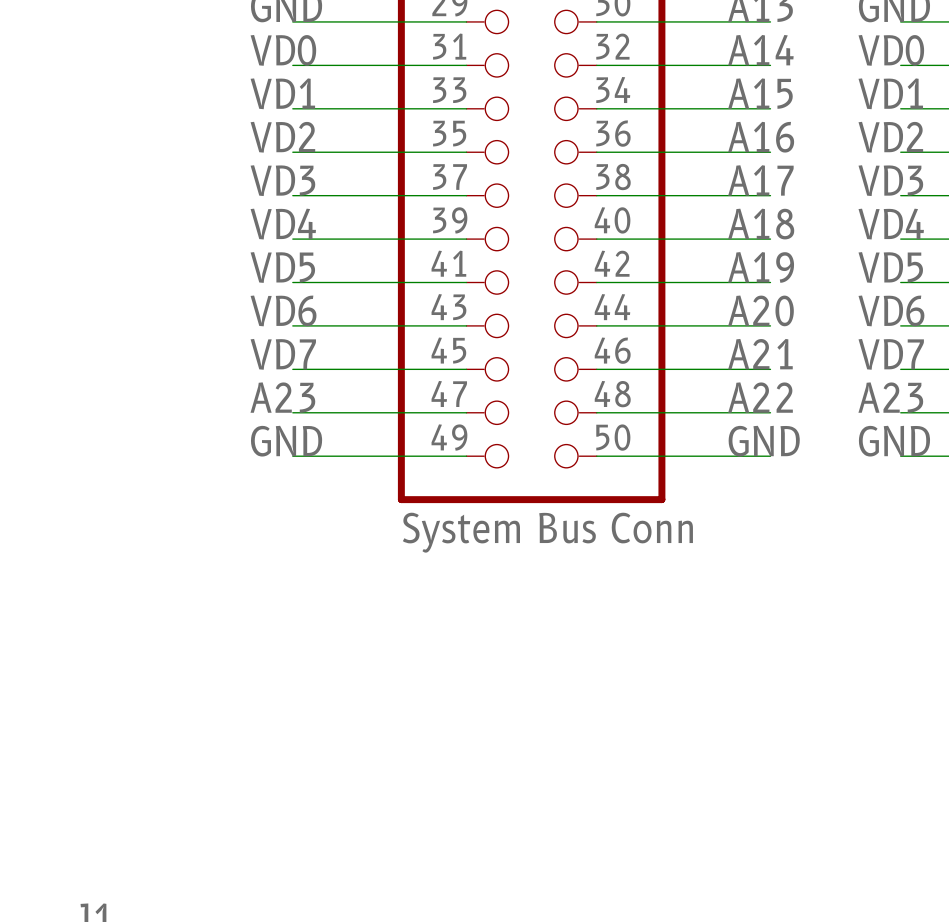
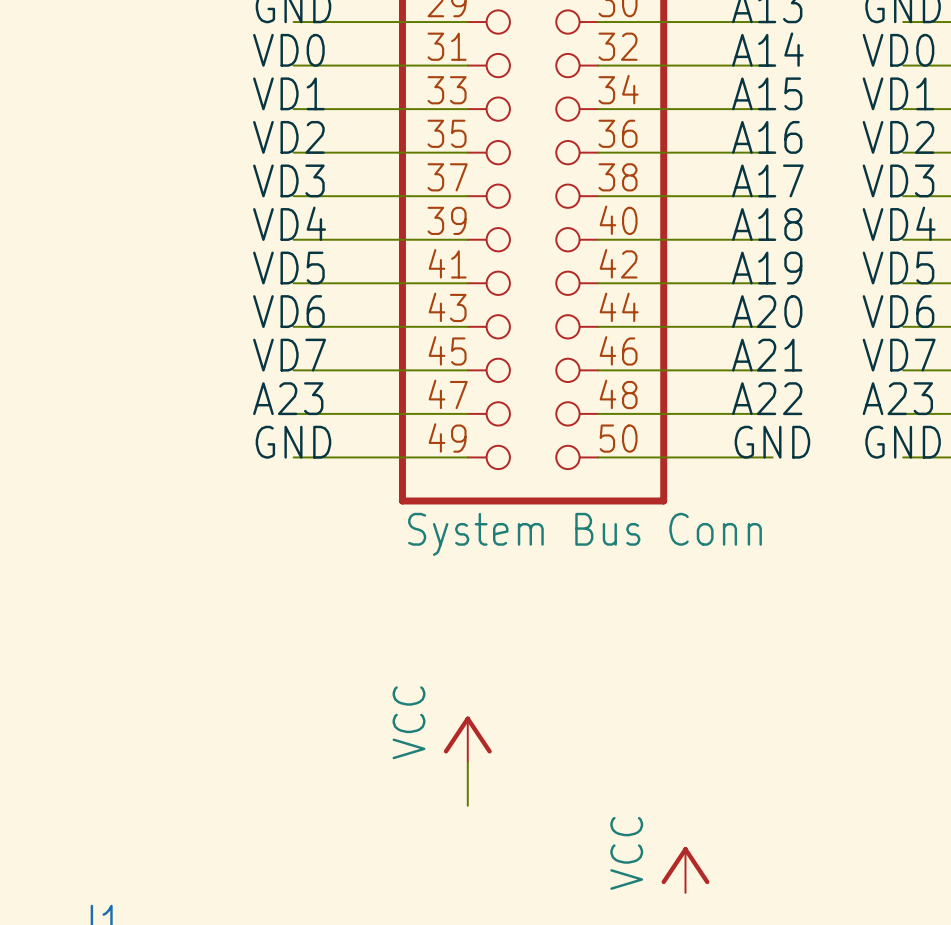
power symbol: none -> VCC (467, 739)
wire: none -> (467, 762) (467, 805)
power symbol: none -> VCC (685, 870)

